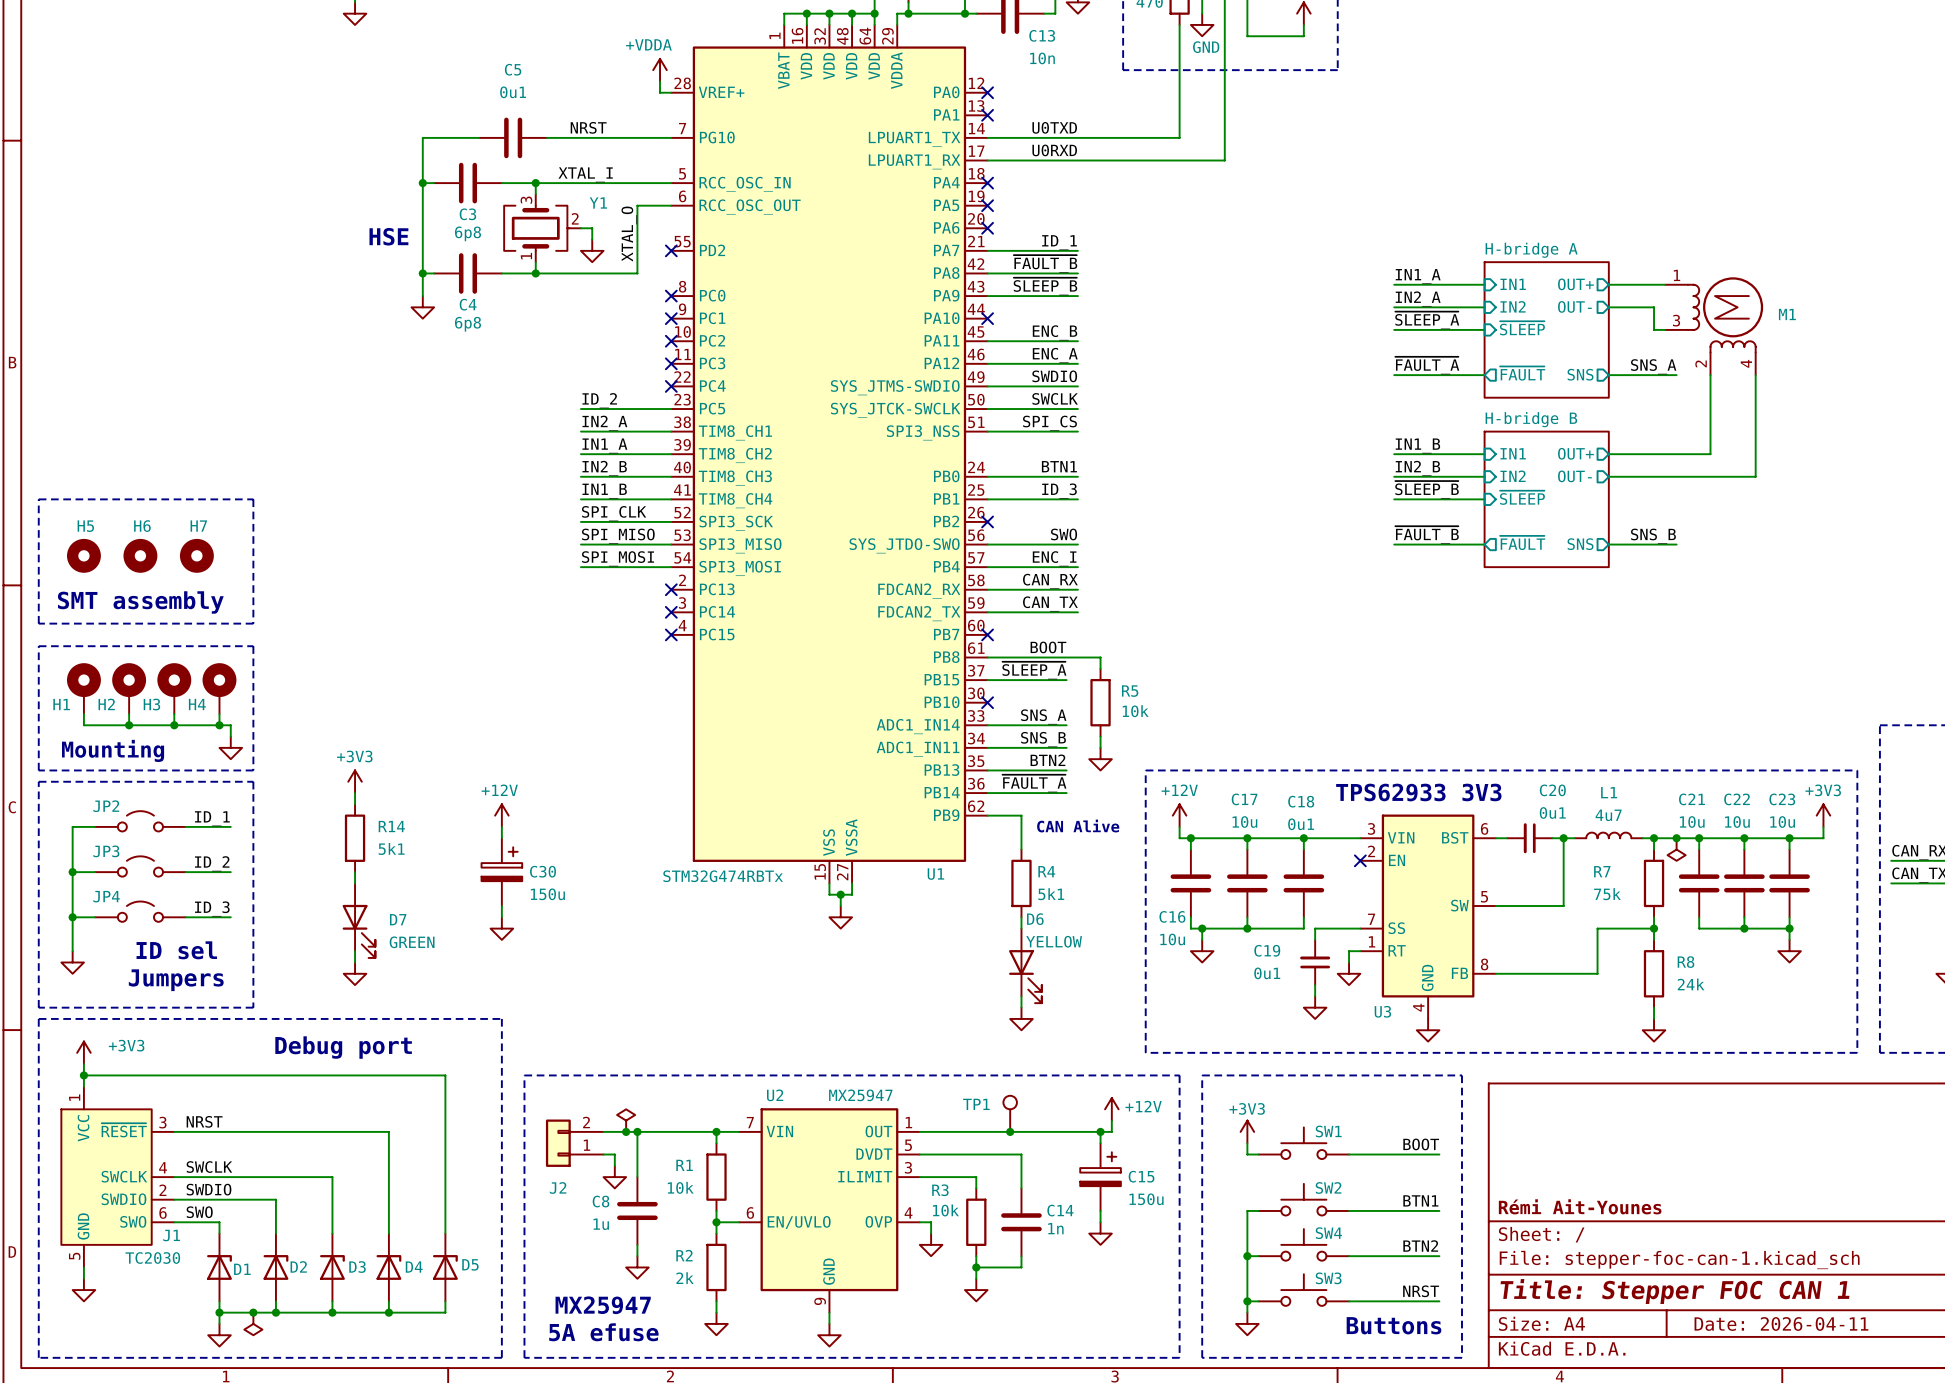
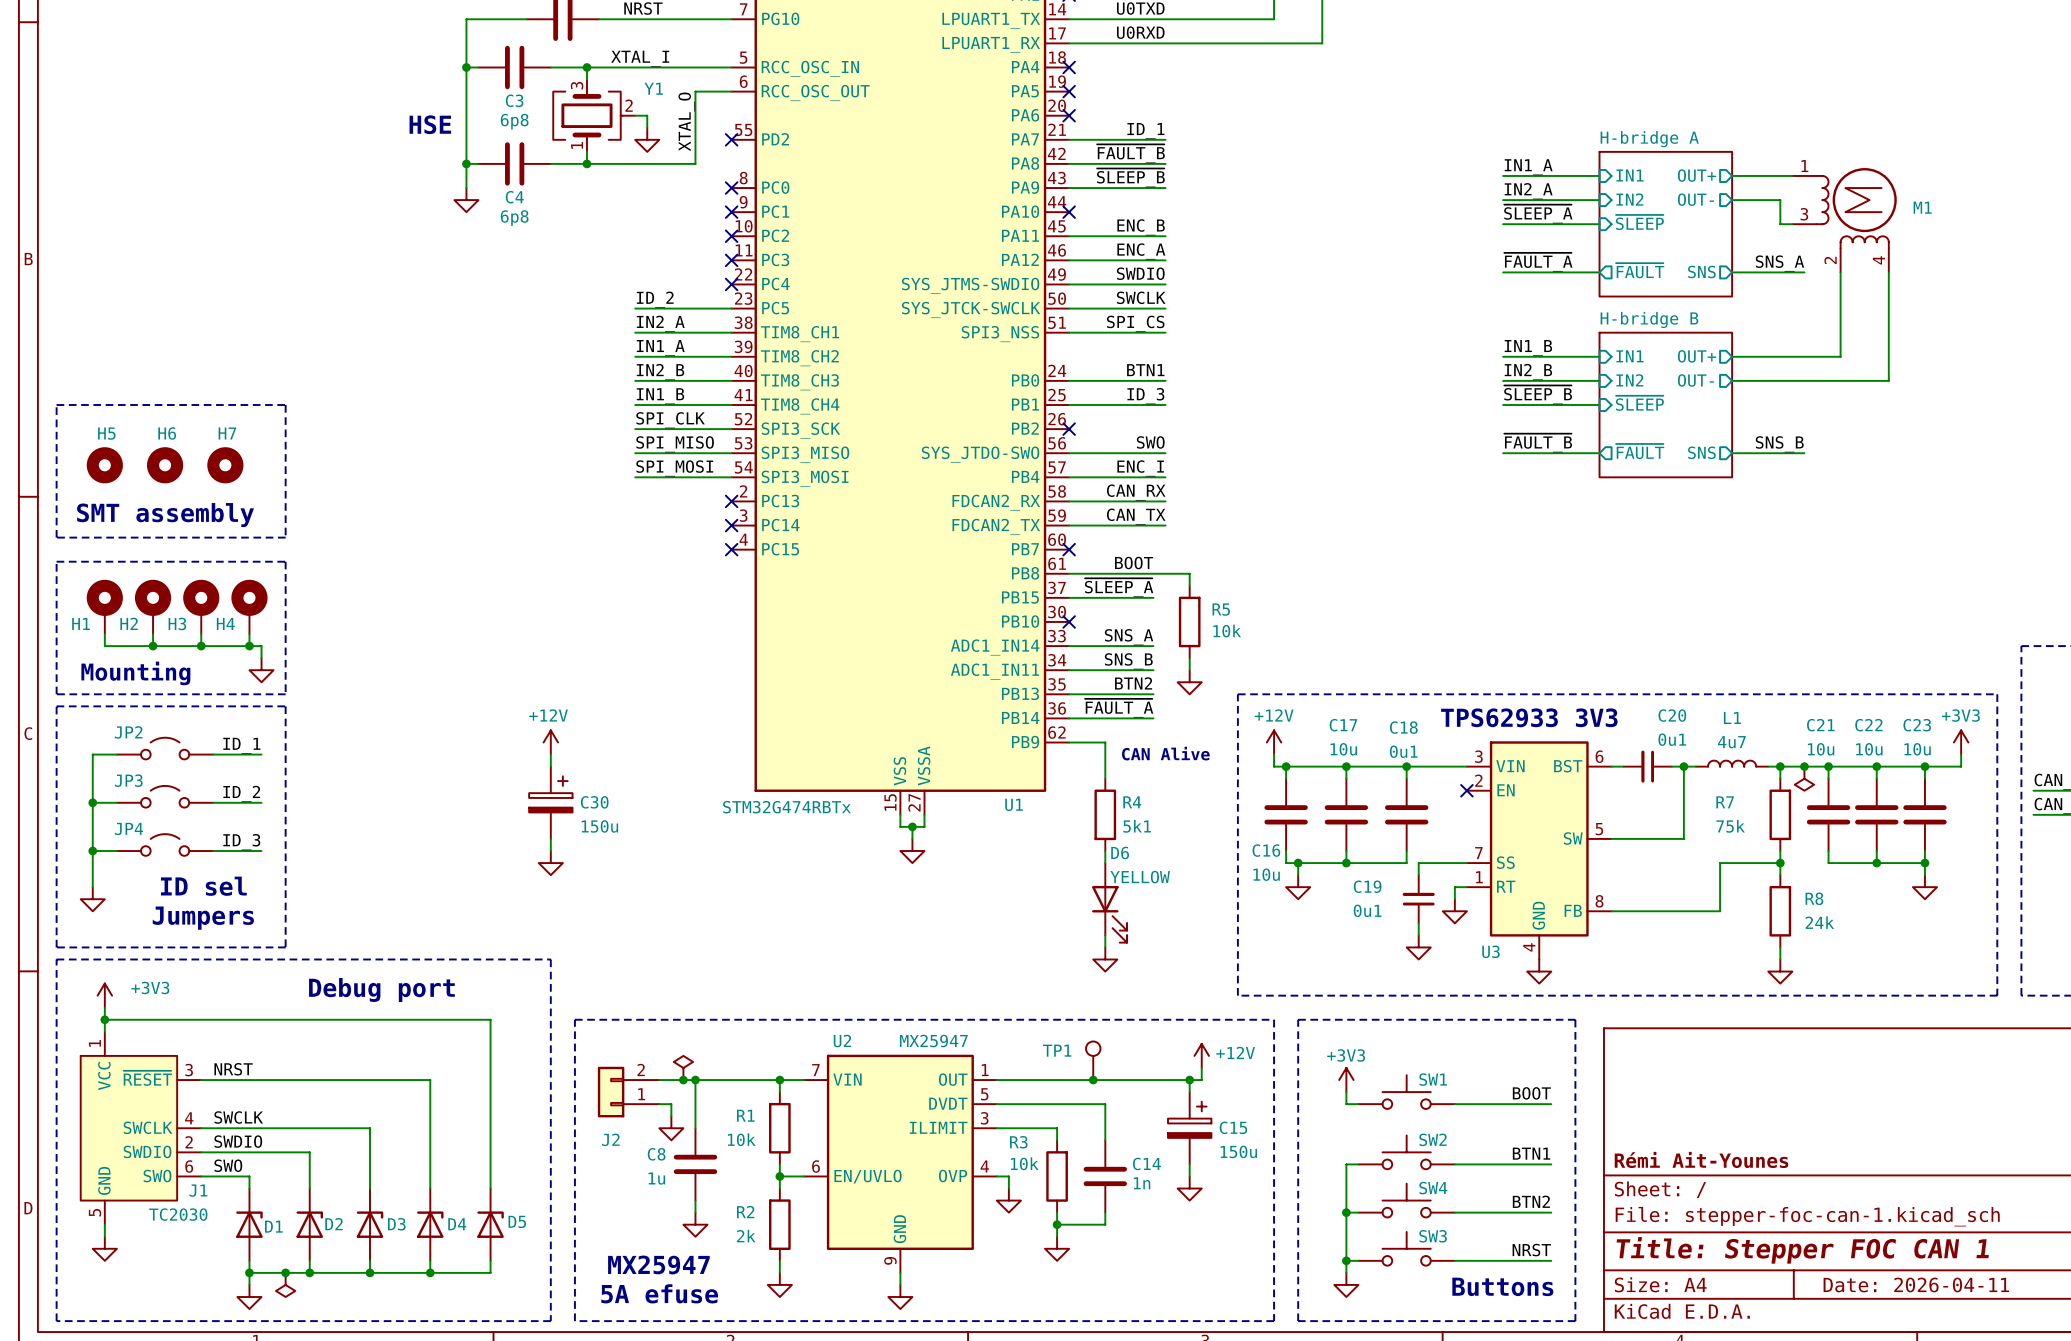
power symbol: +3V3 (355, 781) -> none
wire: (355, 793) (355, 804) -> none
R14: 5k1 (355, 838) -> none
wire: (355, 872) (355, 883) -> none
D7: GREEN (358, 920) -> none
wire: (355, 951) (355, 962) -> none
power symbol: (355, 973) -> none

